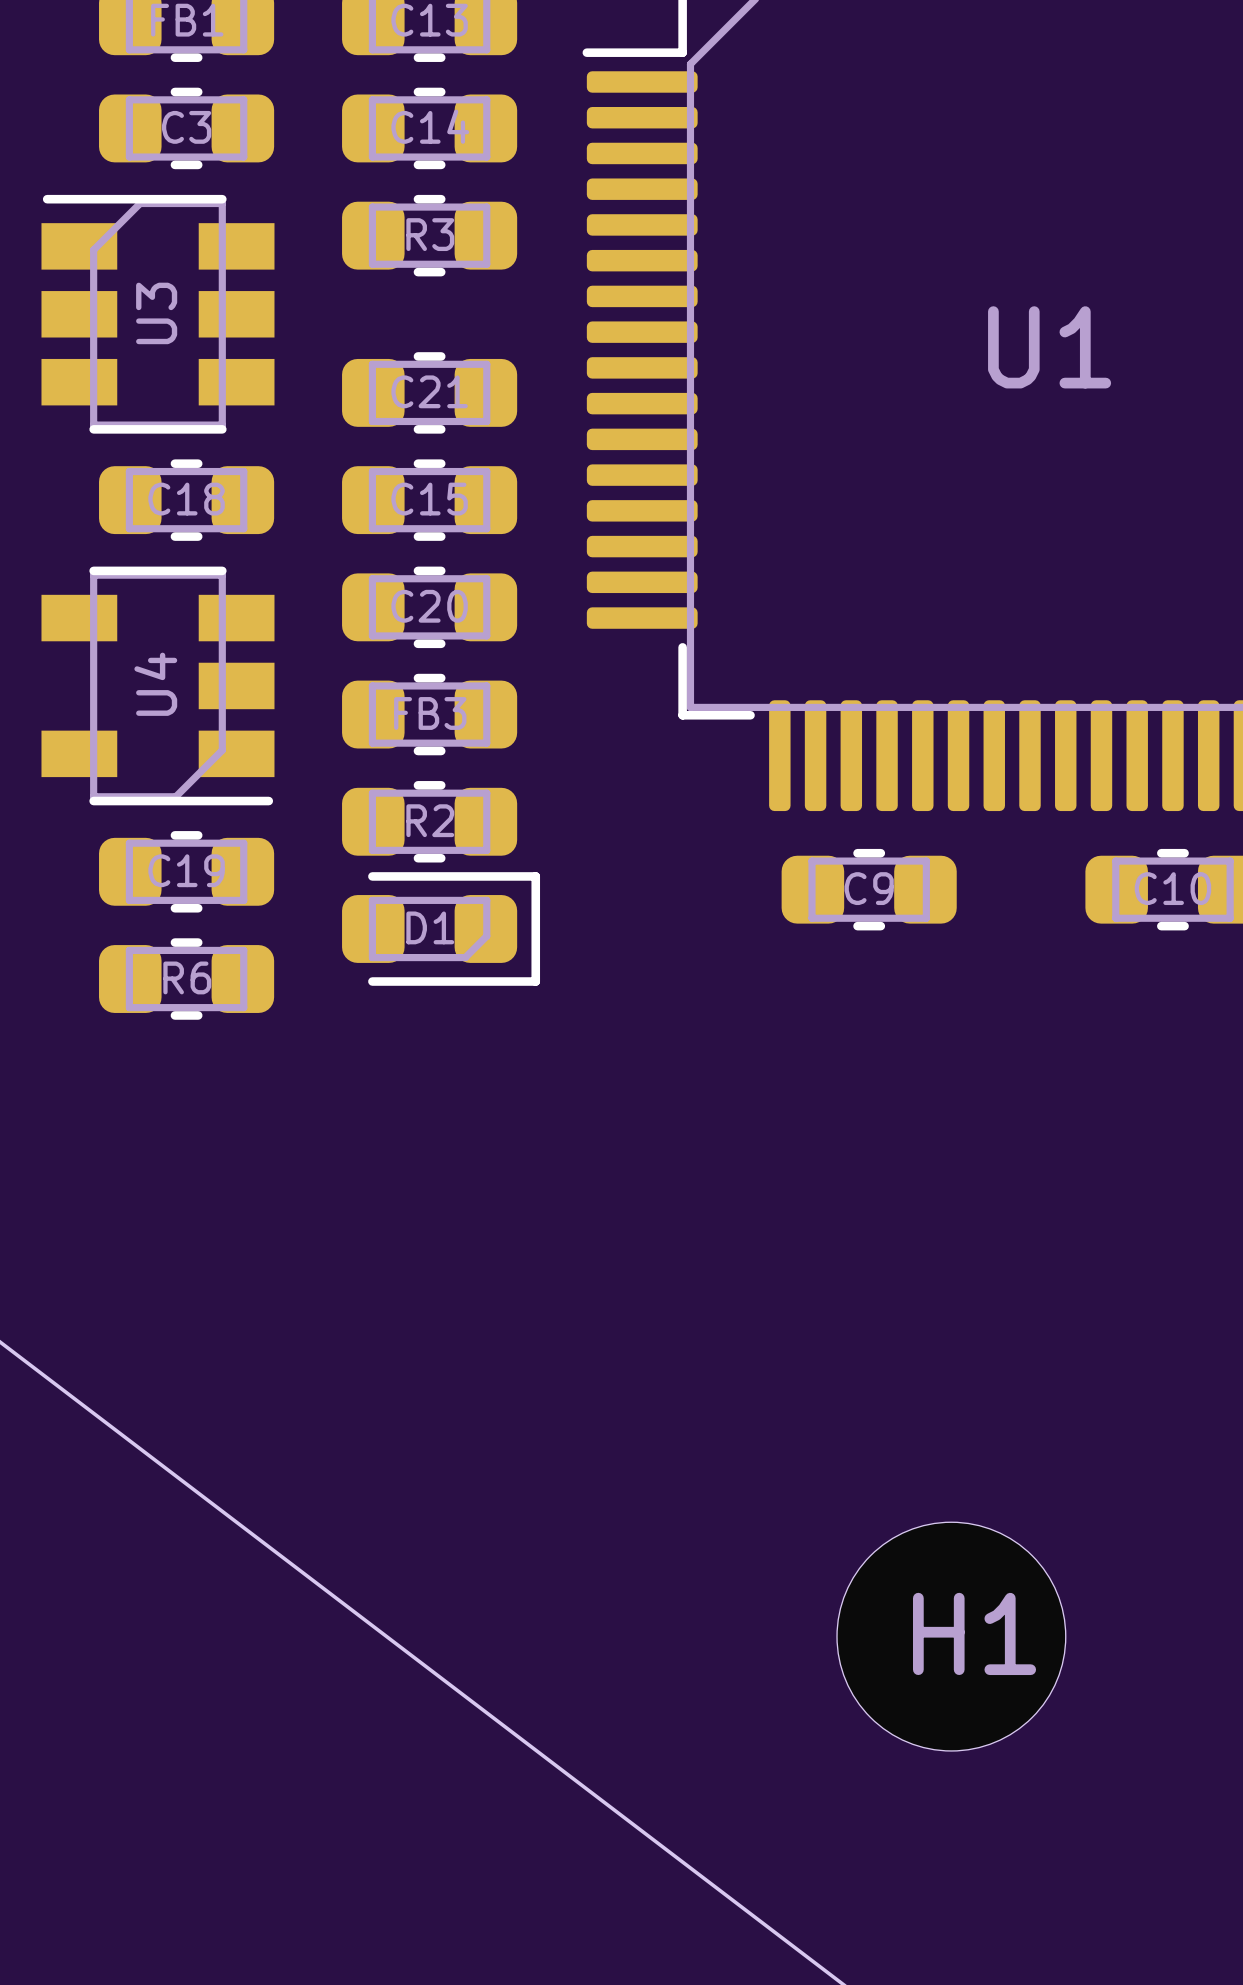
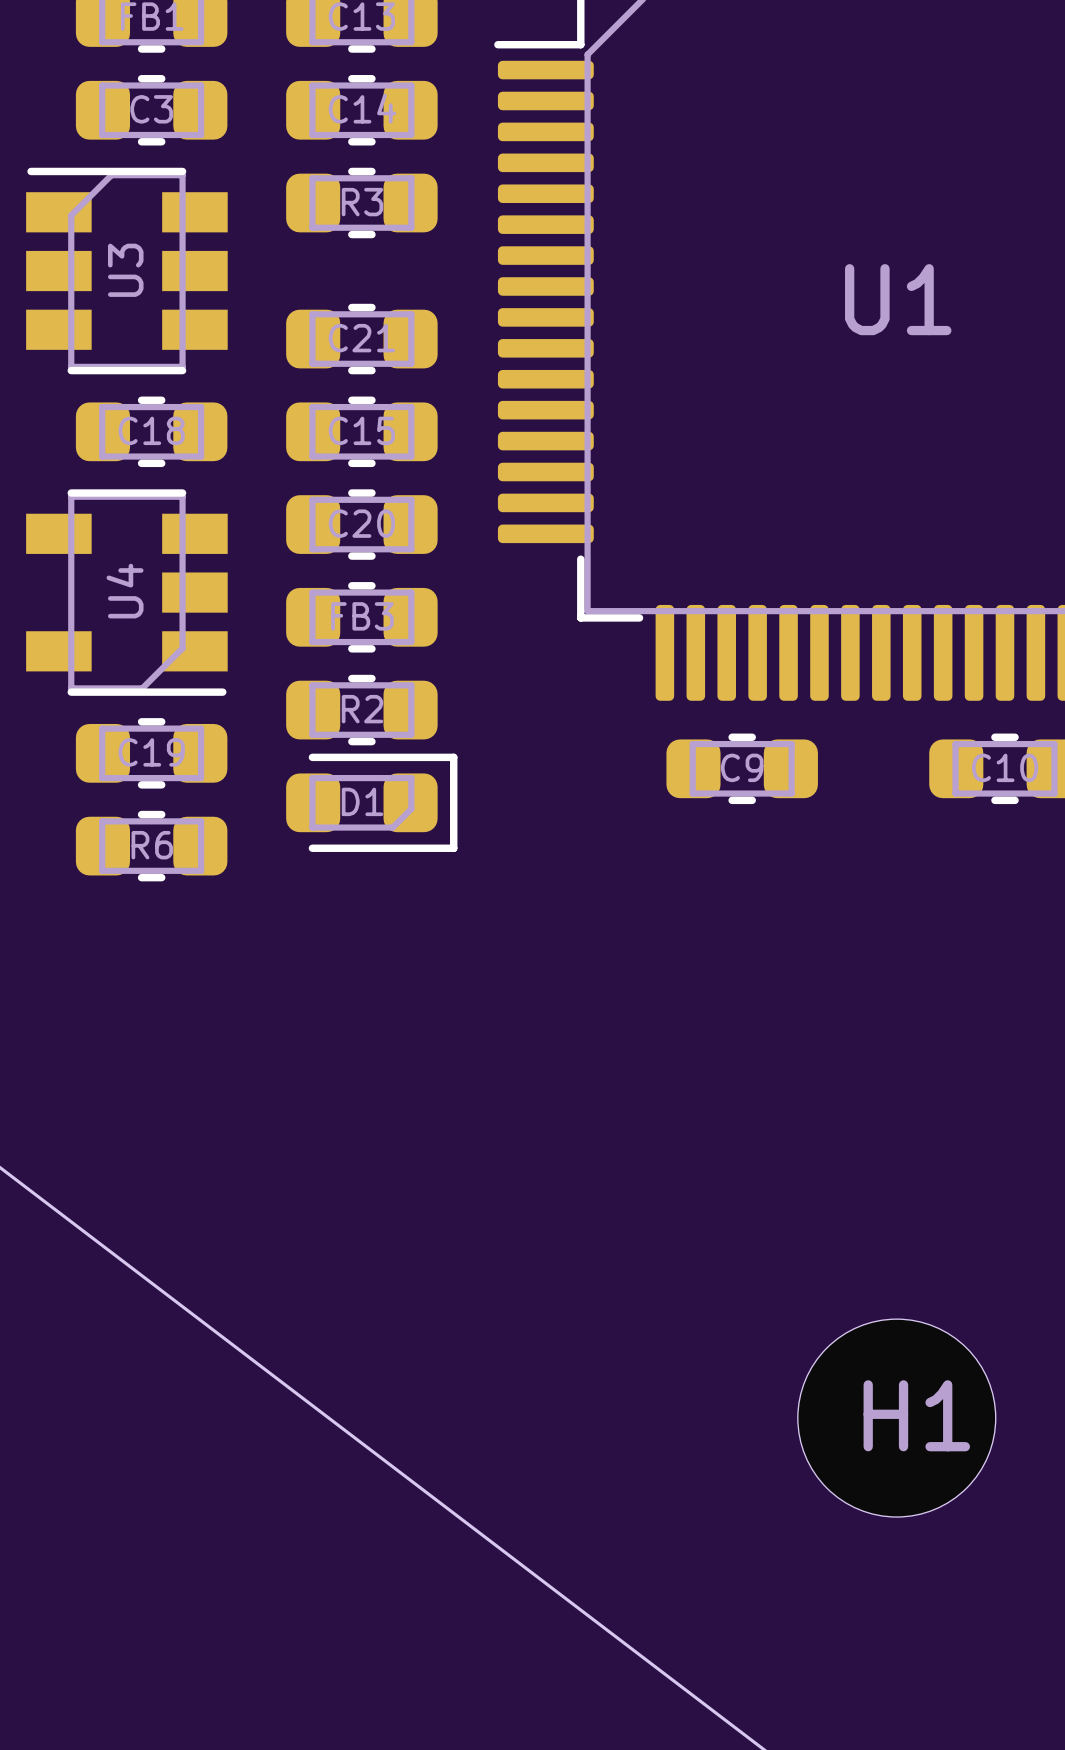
H1 position: (951, 1636) -> (896, 1418)

